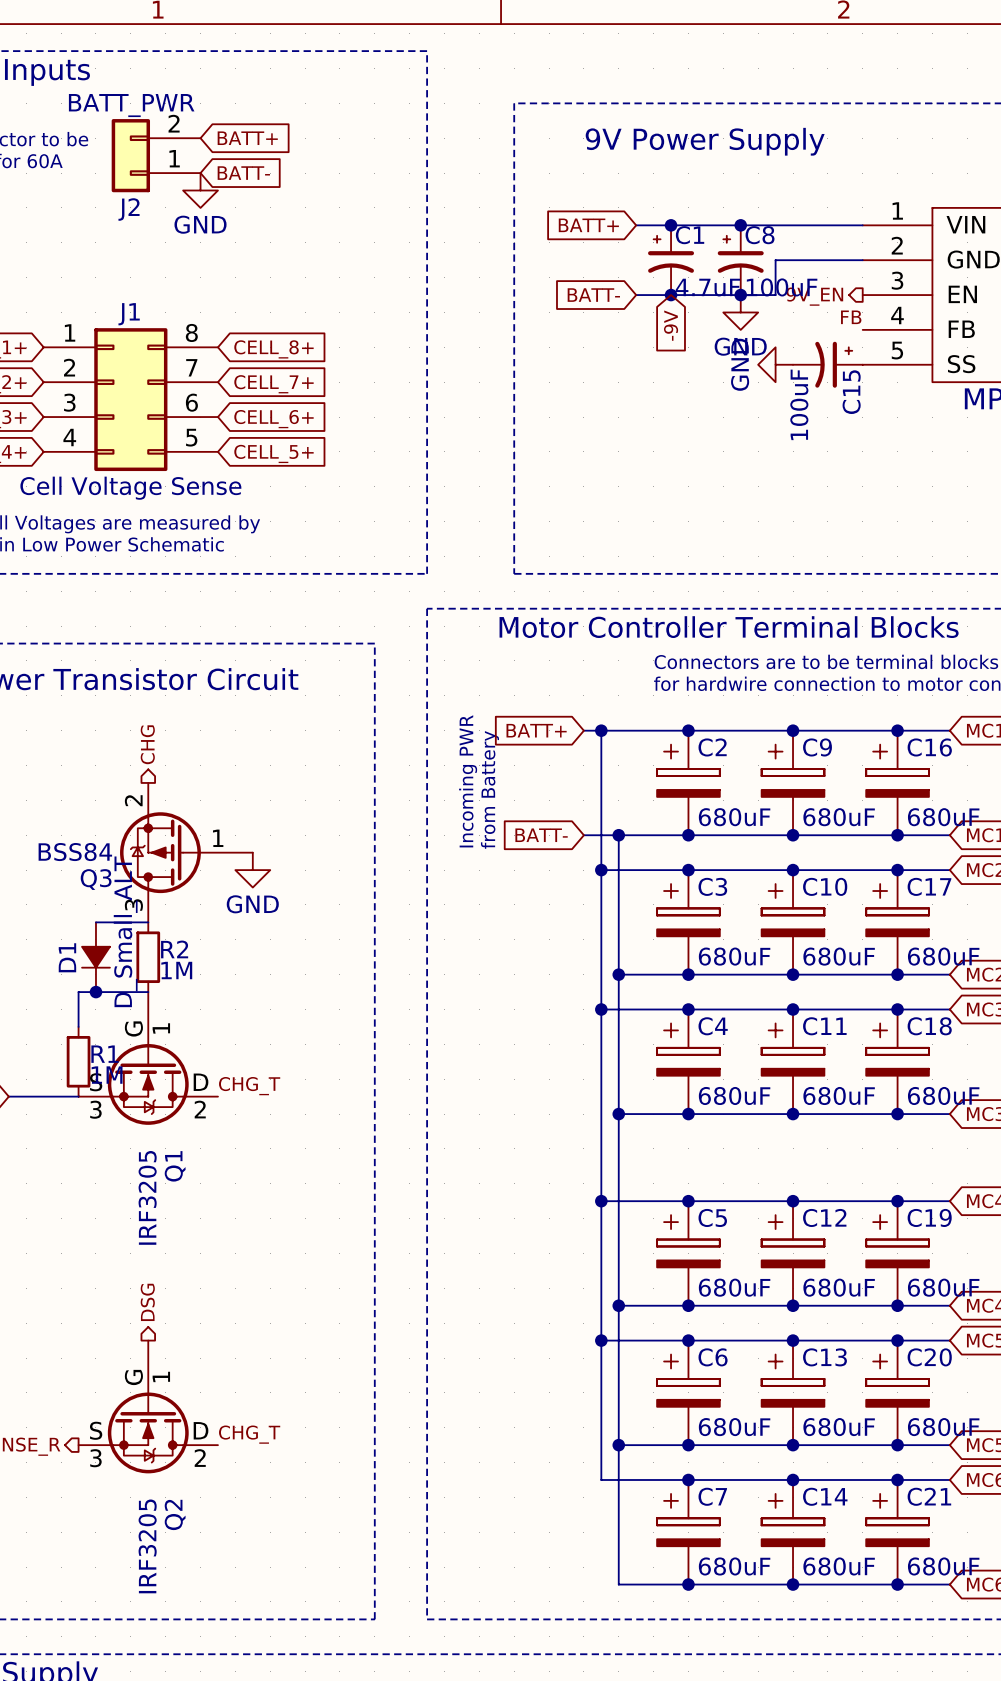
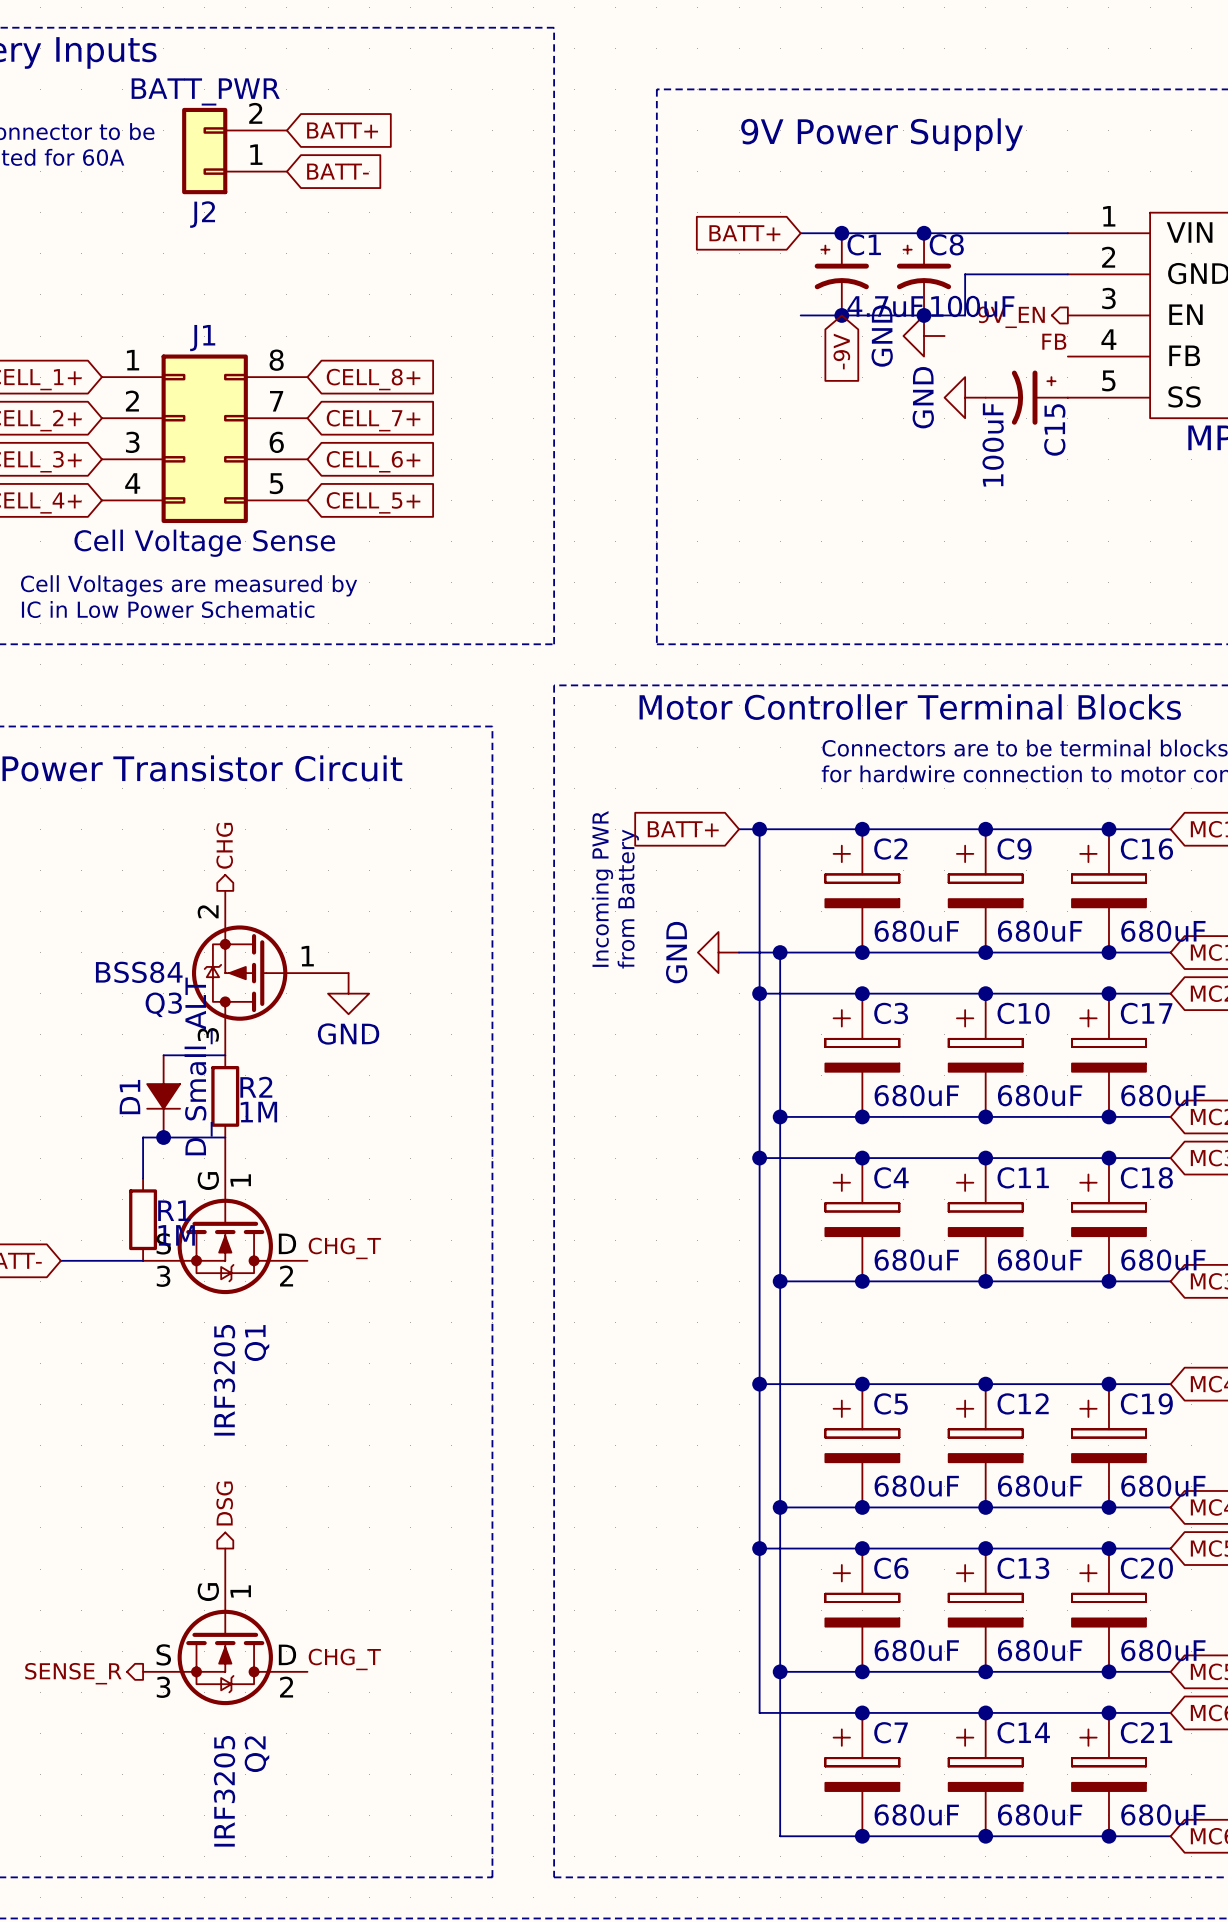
power symbol: GND (200, 190) -> none
global label: BATT- (593, 295) -> none
power symbol rotation: 0° (740, 312) -> 90° clockwise (924, 336)
global label: BATT- (541, 835) -> none
power symbol: none -> GND (718, 952)

